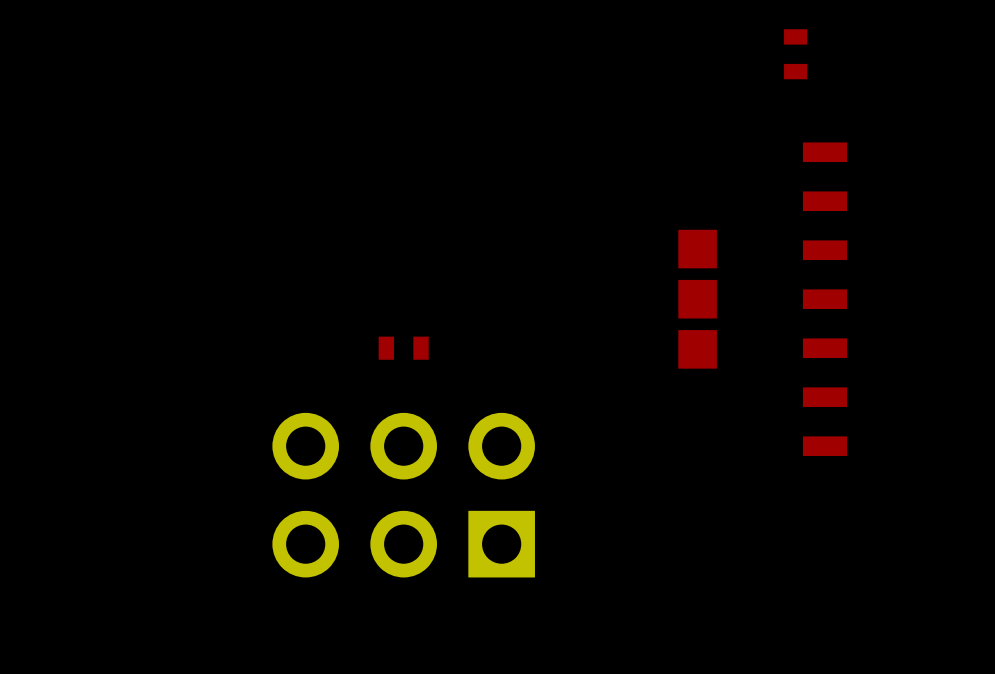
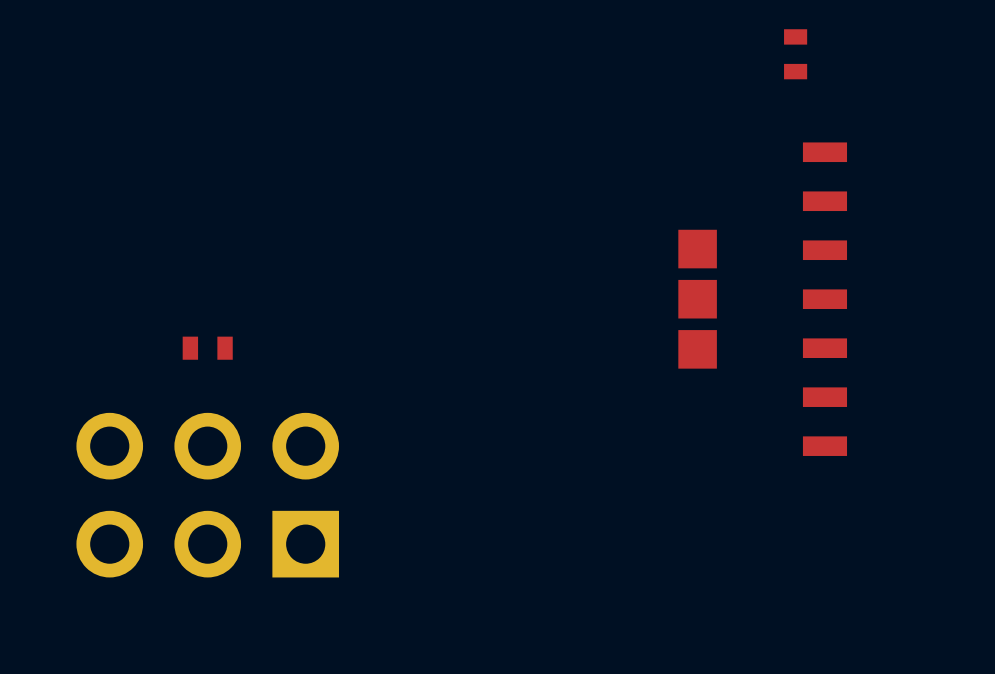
part position: (403, 348) -> (207, 348)
part position: (403, 495) -> (207, 495)

